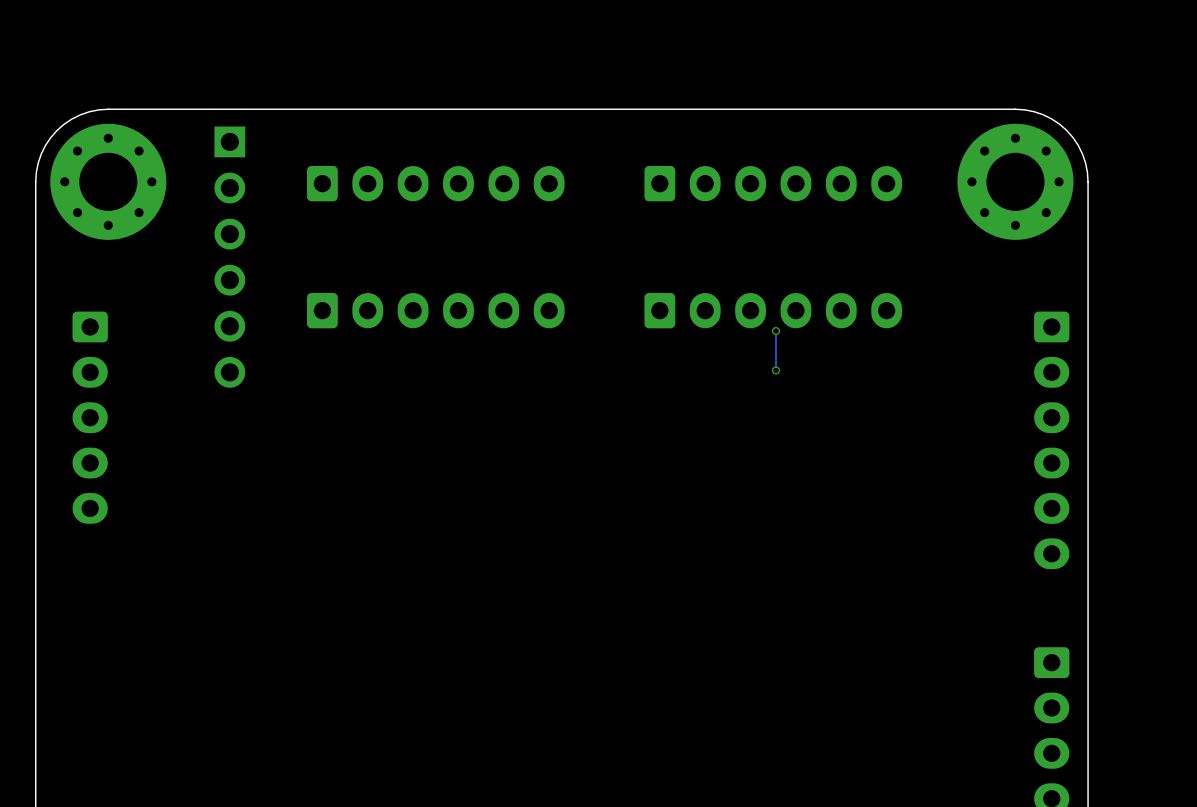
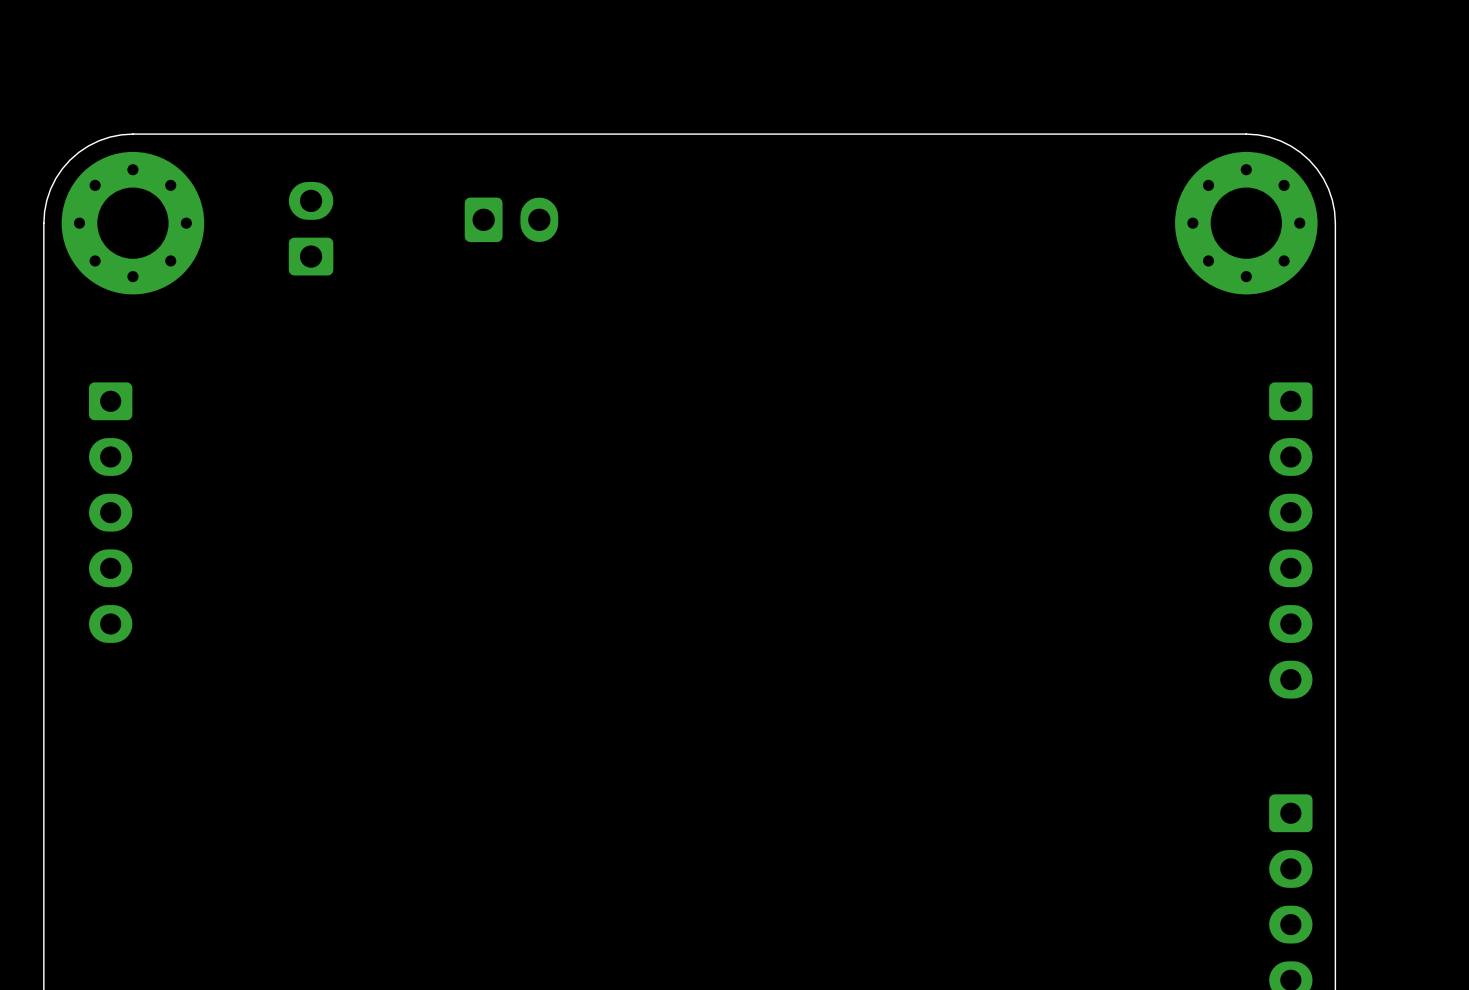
part: none -> (511, 219)
part: (435, 183) -> none
part: (773, 183) -> none
part: none -> (311, 228)
part: (229, 257) -> none
part: (435, 310) -> none
part: (773, 310) -> none
track: (775, 331) (775, 370) -> none
via: (775, 331) -> none
via: (775, 370) -> none

